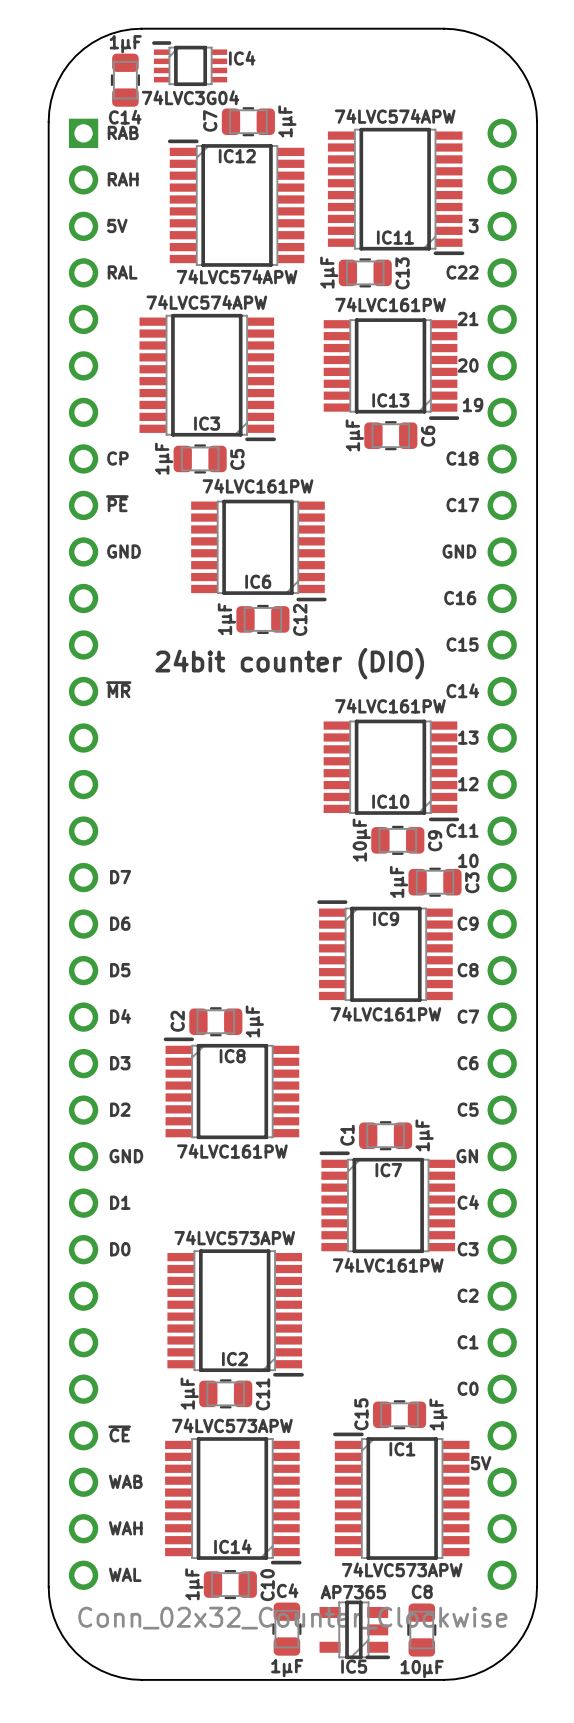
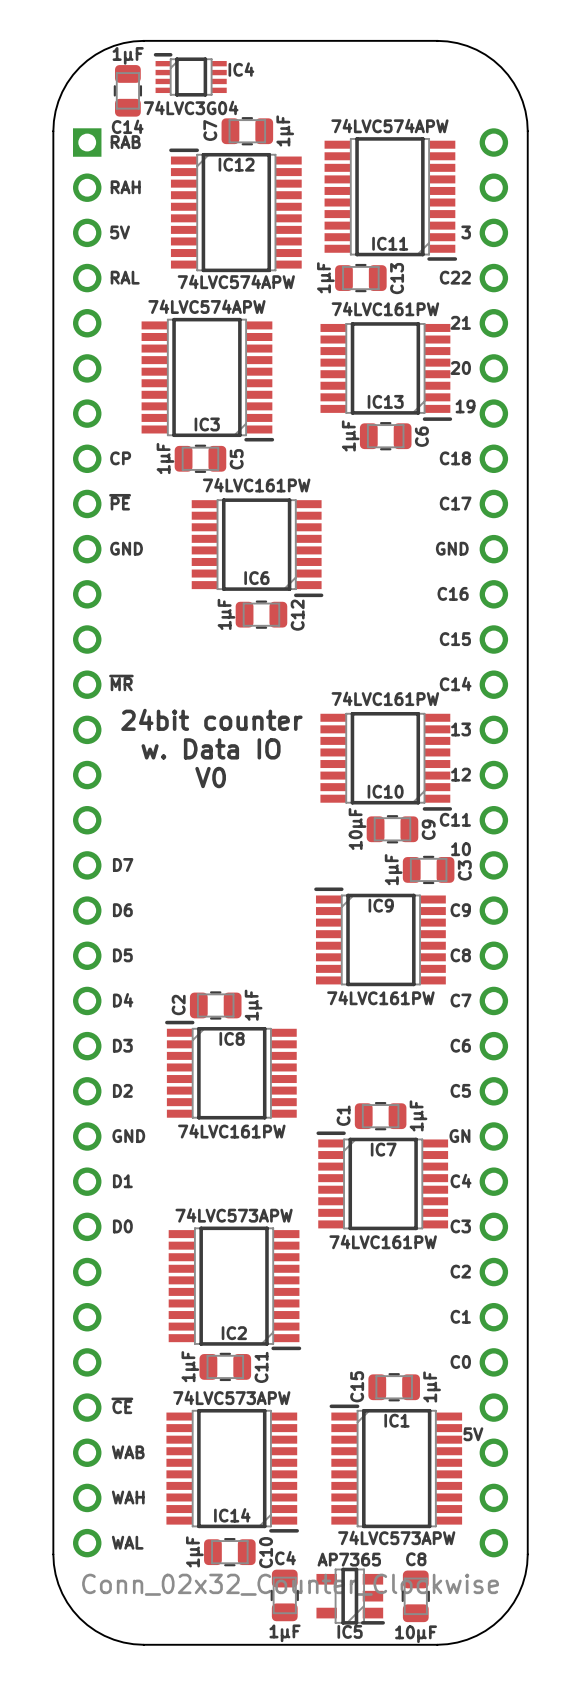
text: 24bit counter (DIO) (289, 663) -> none
text: none -> 24bit counter (211, 719)
text: none -> w. Data IO (211, 748)
text: none -> V0 (210, 777)

